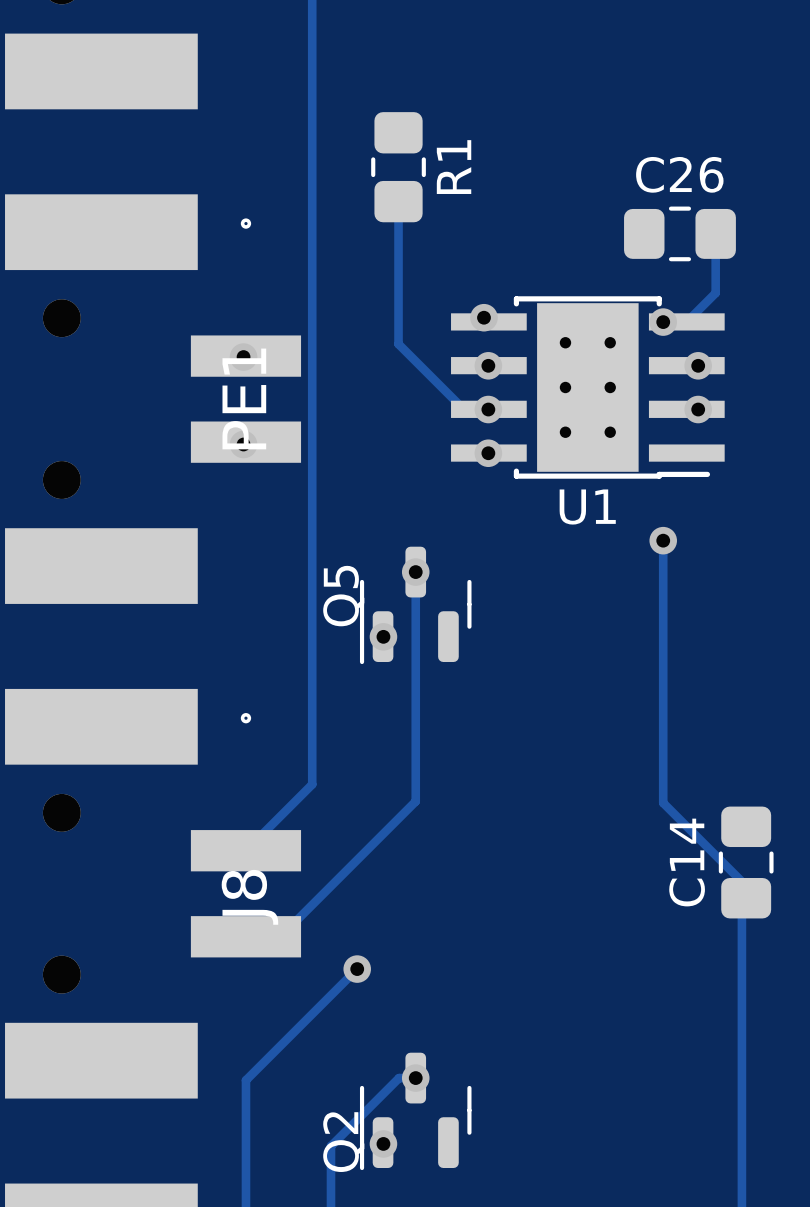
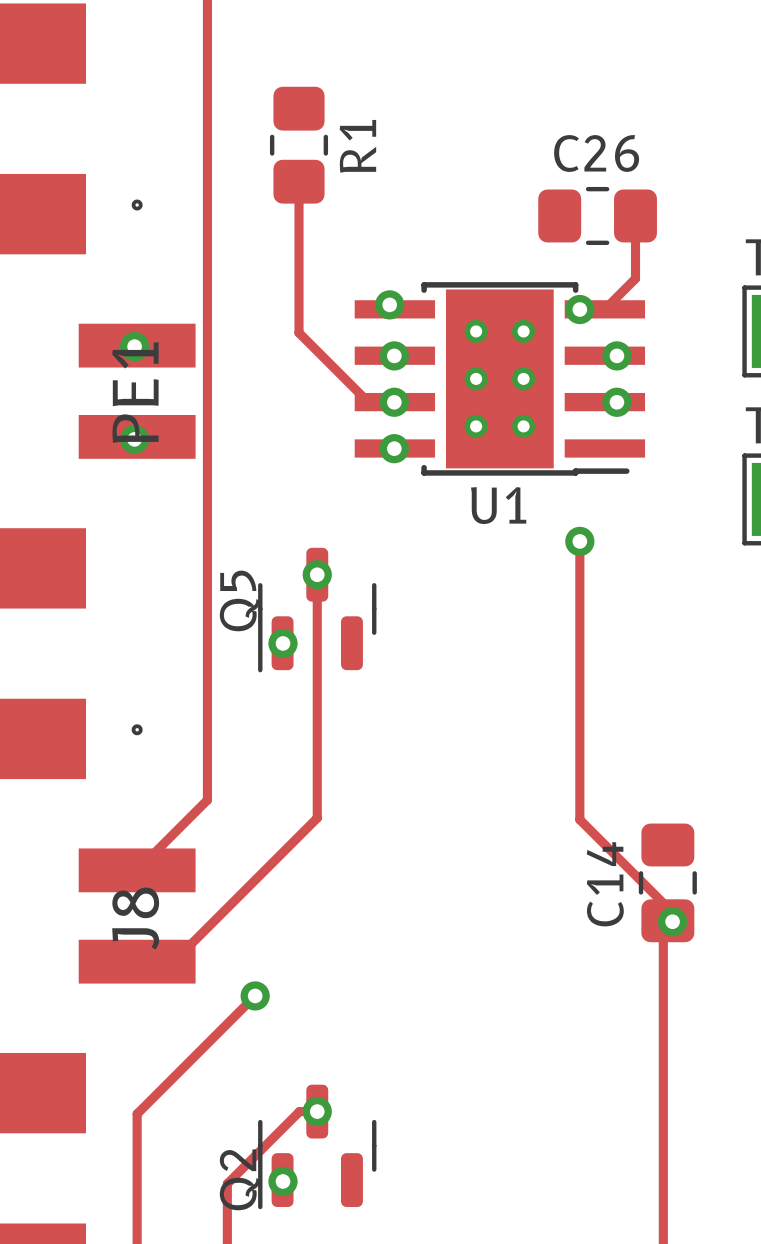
via: none -> (672, 921)

